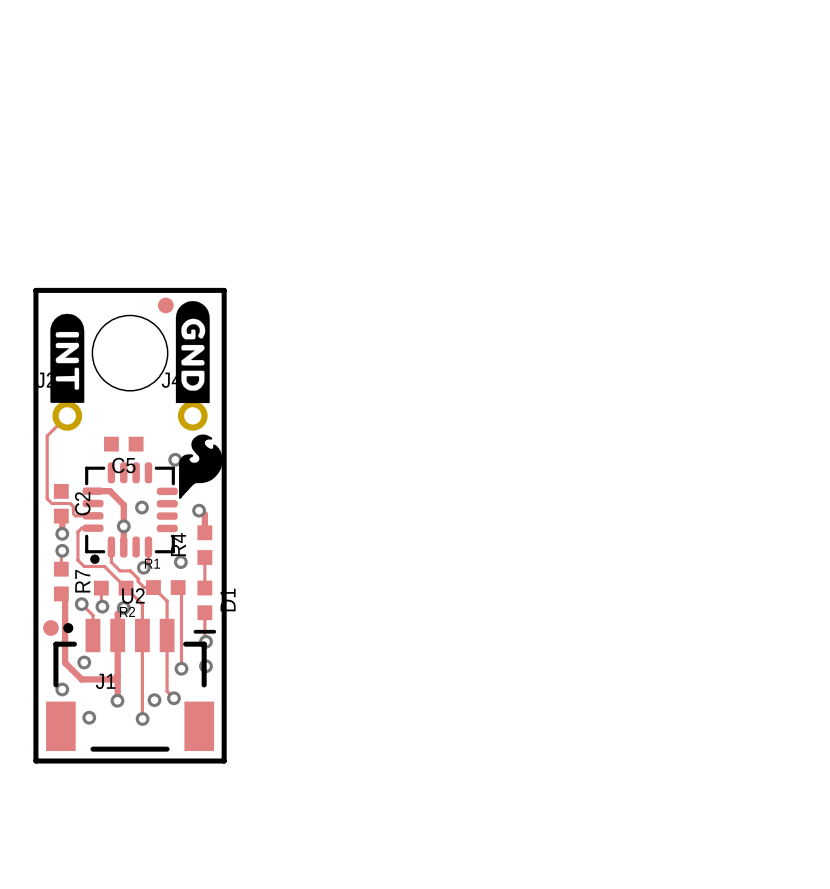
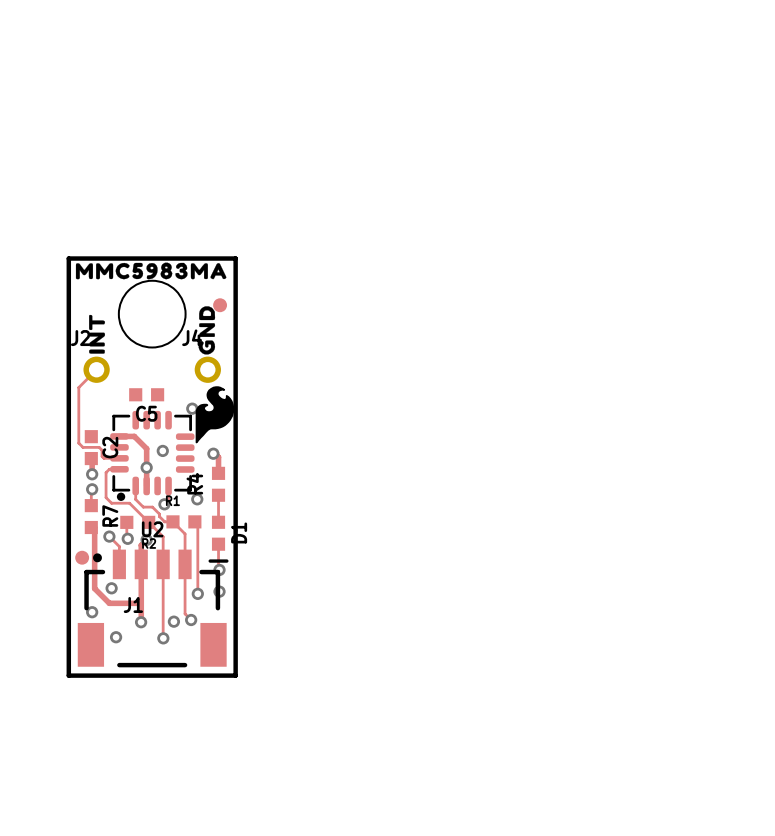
drawing: none -> [75, 262, 227, 280]
drawing shape: [175, 301, 210, 404] -> [198, 306, 216, 355]
part position: (165, 305) -> (220, 305)
drawing shape: [50, 313, 85, 403] -> [89, 314, 106, 354]

